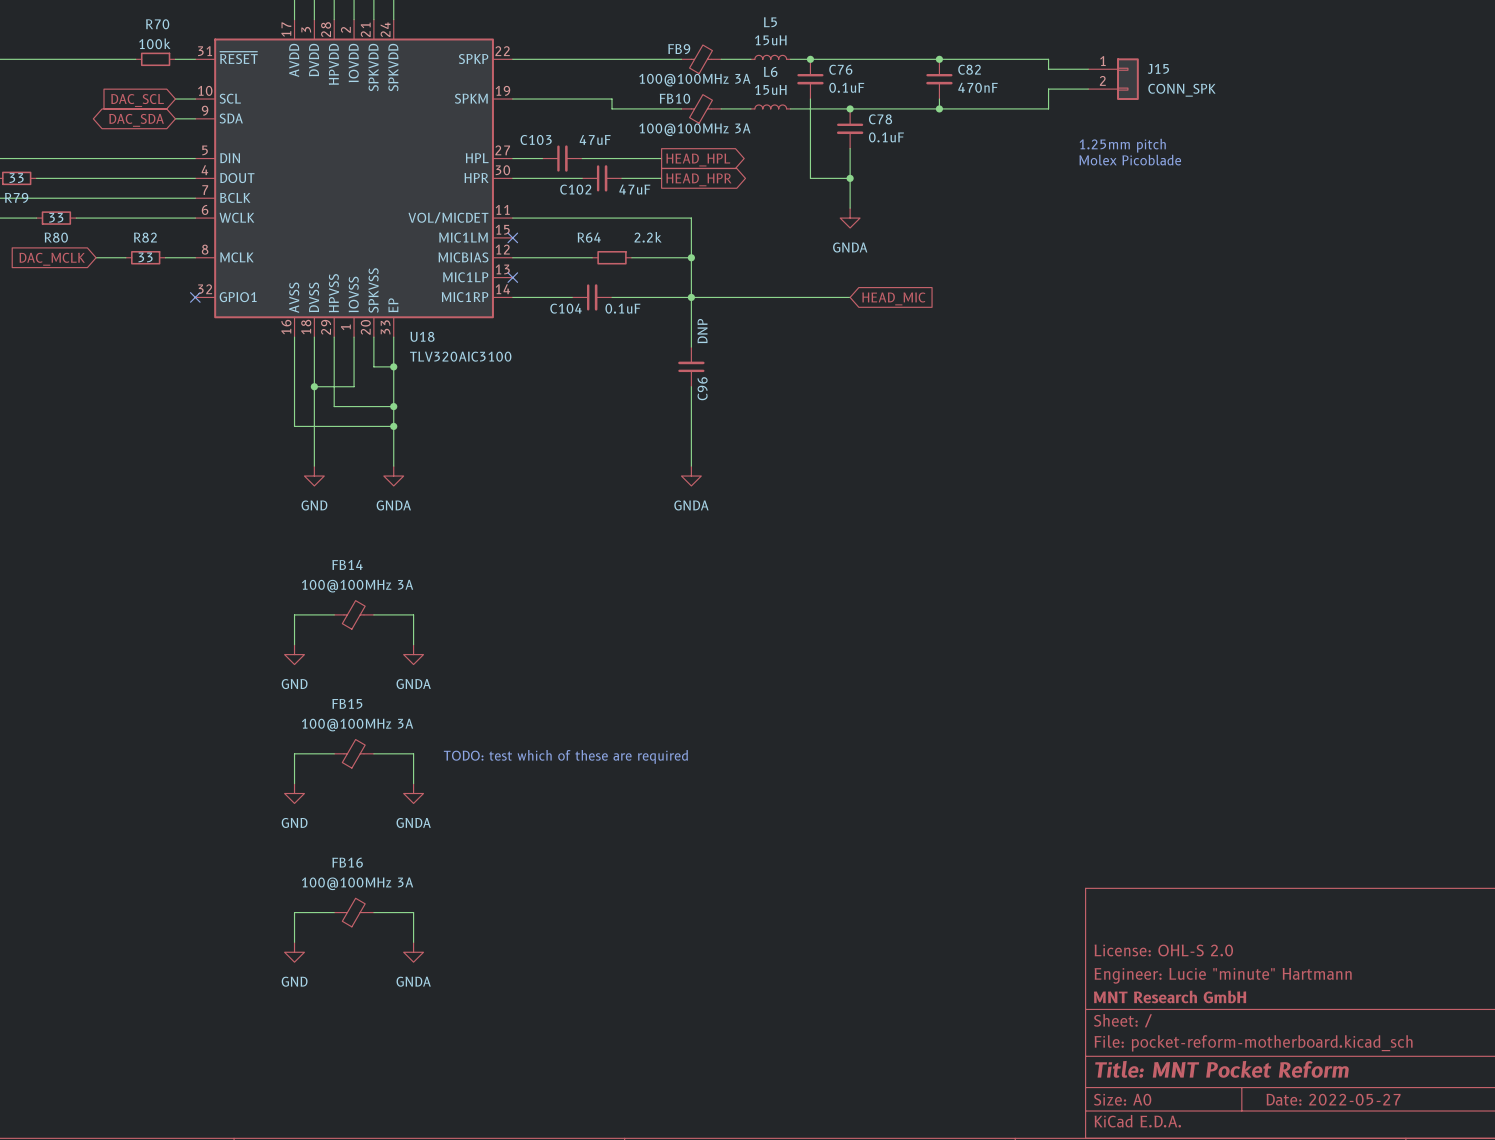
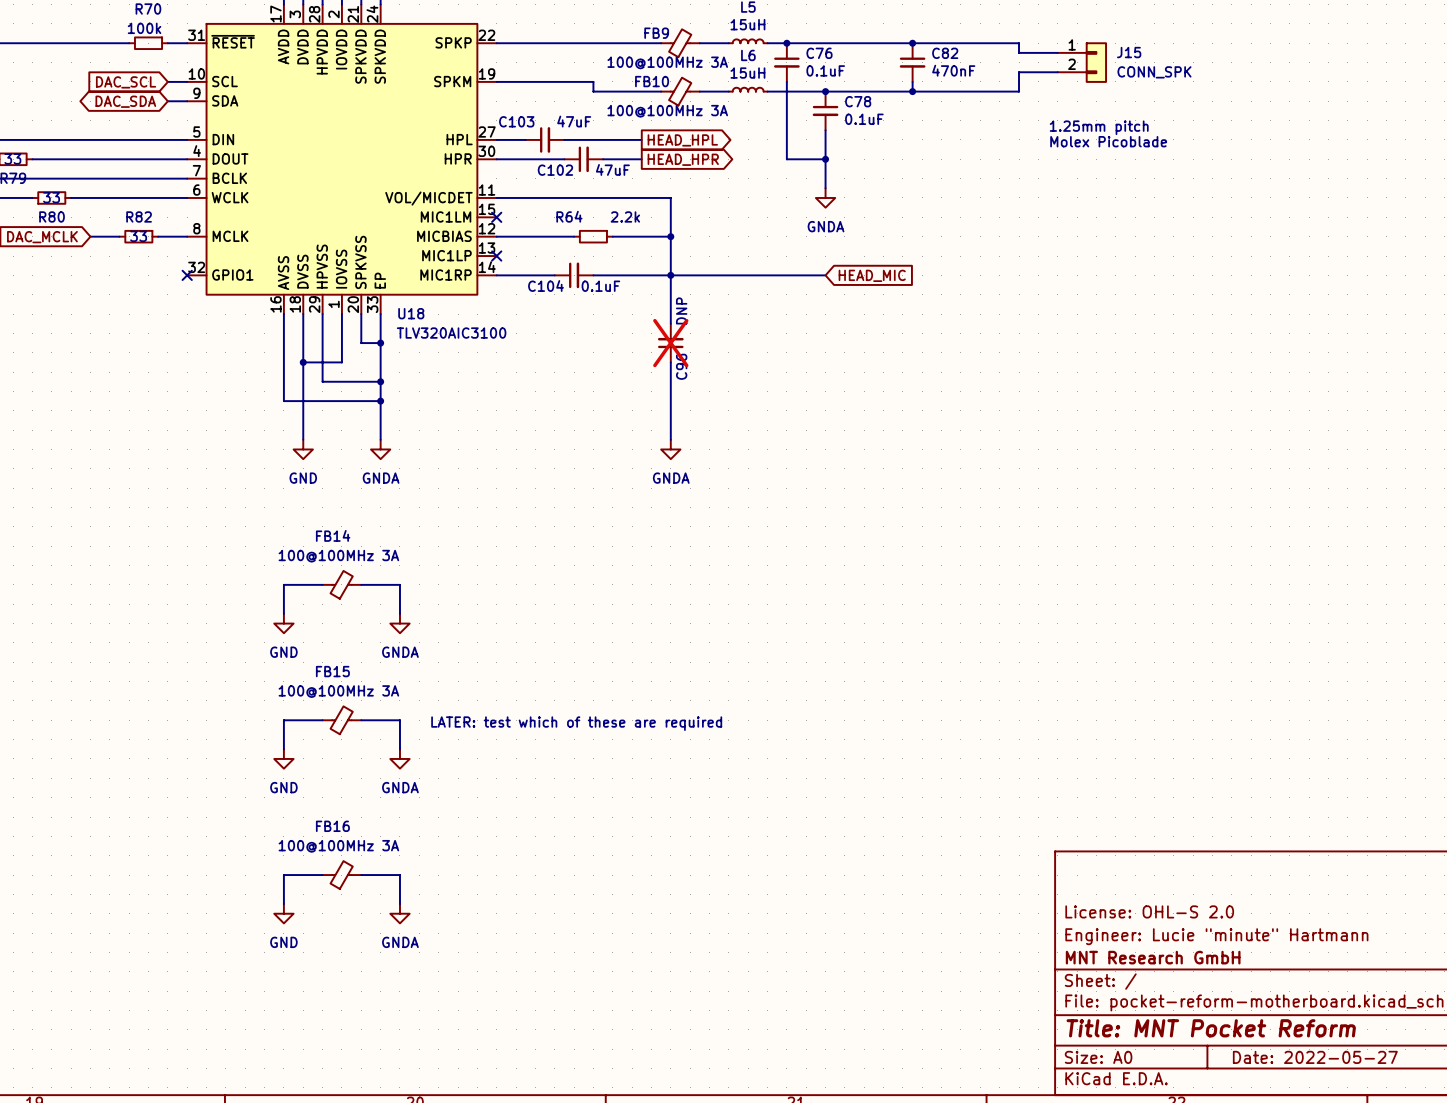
C96 do-not-place cross: none -> (670, 343)
text: TODO: test which of these are required (565, 756) -> LATER: test which of these are required (576, 723)

